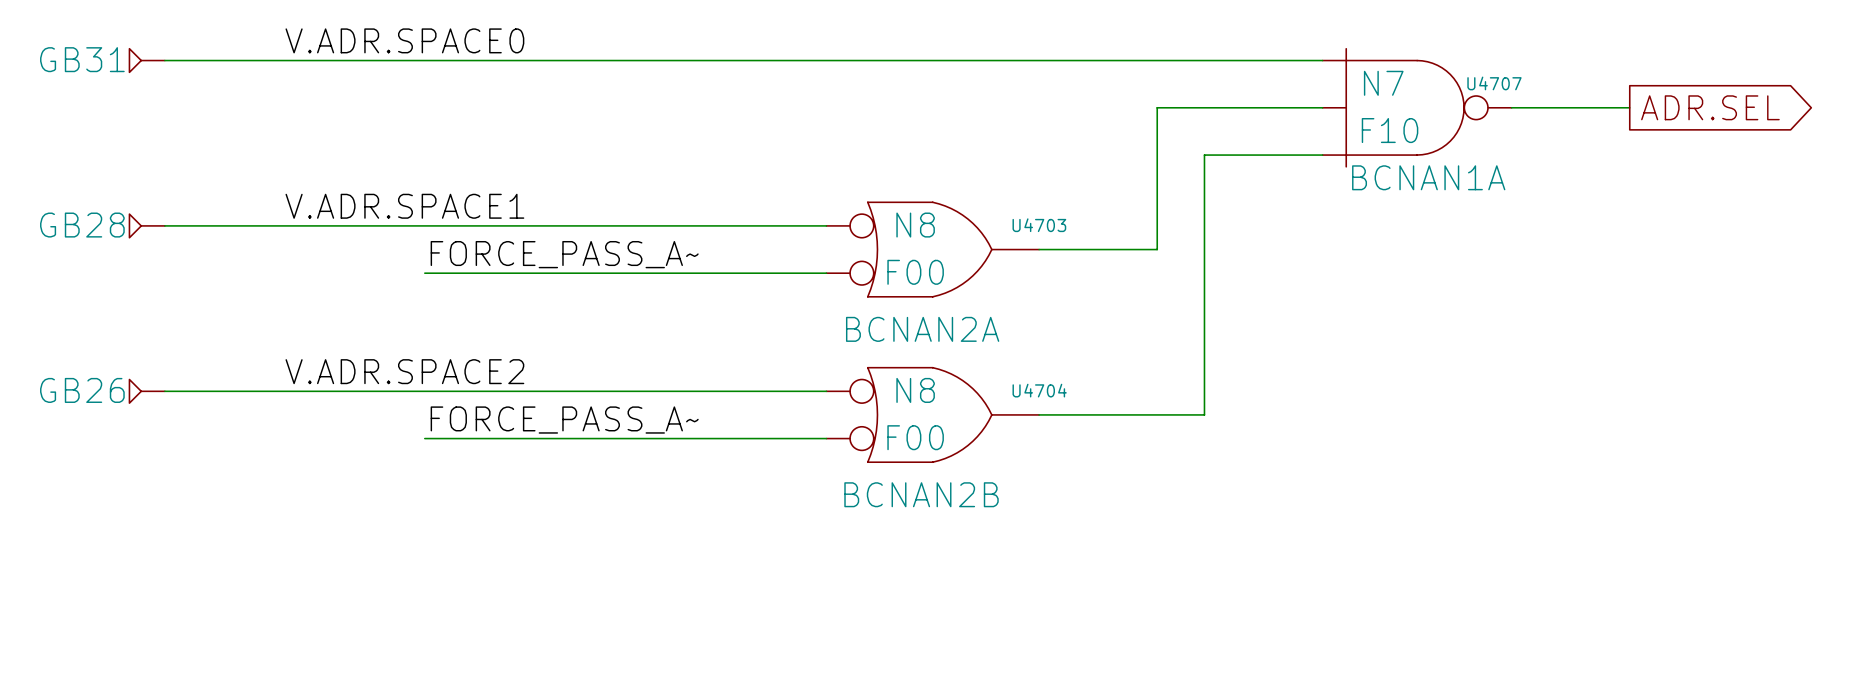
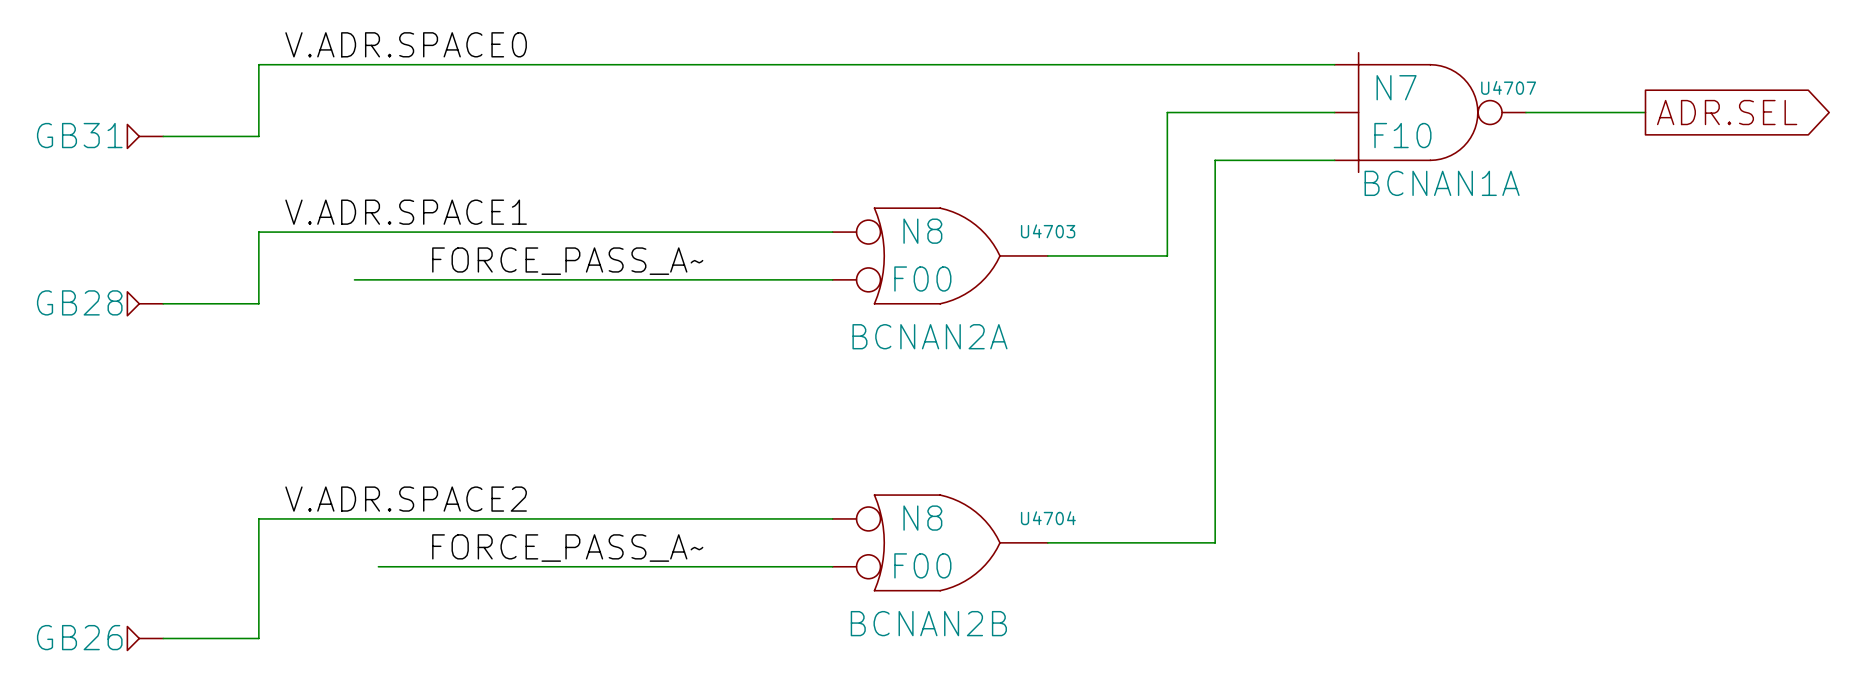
GB31 position: (146, 60) -> (144, 136)
wire: (164, 60) (259, 60) -> (163, 136) (258, 136) (258, 64)
GB28 position: (146, 225) -> (144, 303)
wire: (164, 225) (259, 225) -> (163, 303) (258, 303) (258, 232)
wire: none -> (354, 279) (426, 279)
label position: V.ADR.SPACE2 (404, 371) -> V.ADR.SPACE2 (406, 499)
GB26 position: (146, 391) -> (144, 638)
wire: (164, 391) (826, 391) -> none
U4704 position: (932, 414) -> (940, 542)
wire: (1039, 414) (1204, 414) -> (1047, 542) (1215, 542) (1215, 423)
label position: FORCE_PASS_A~ (564, 420) -> FORCE_PASS_A~ (567, 548)
wire: (424, 438) (826, 438) -> none
wire: none -> (832, 518) (258, 518) (258, 638) (163, 638)
wire: none -> (378, 566) (832, 566)

